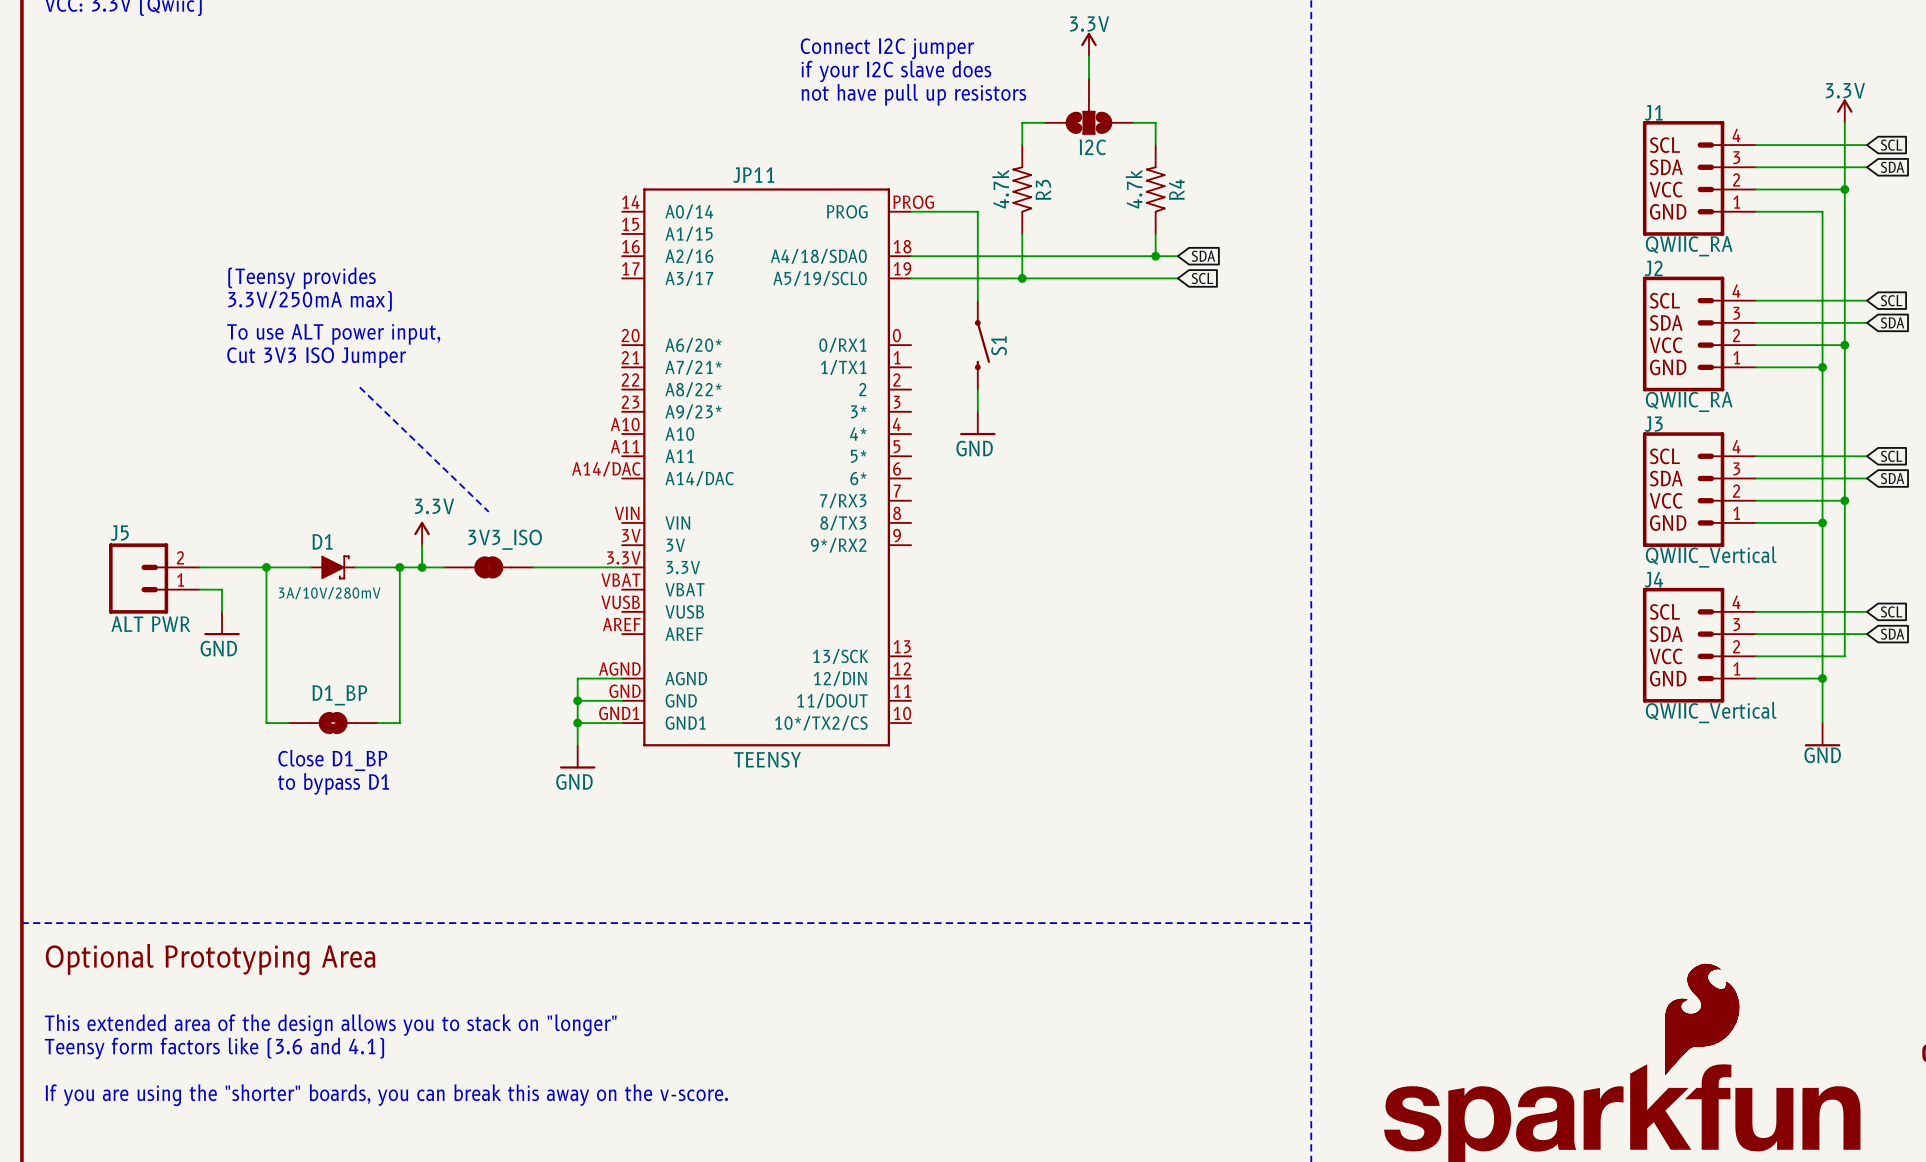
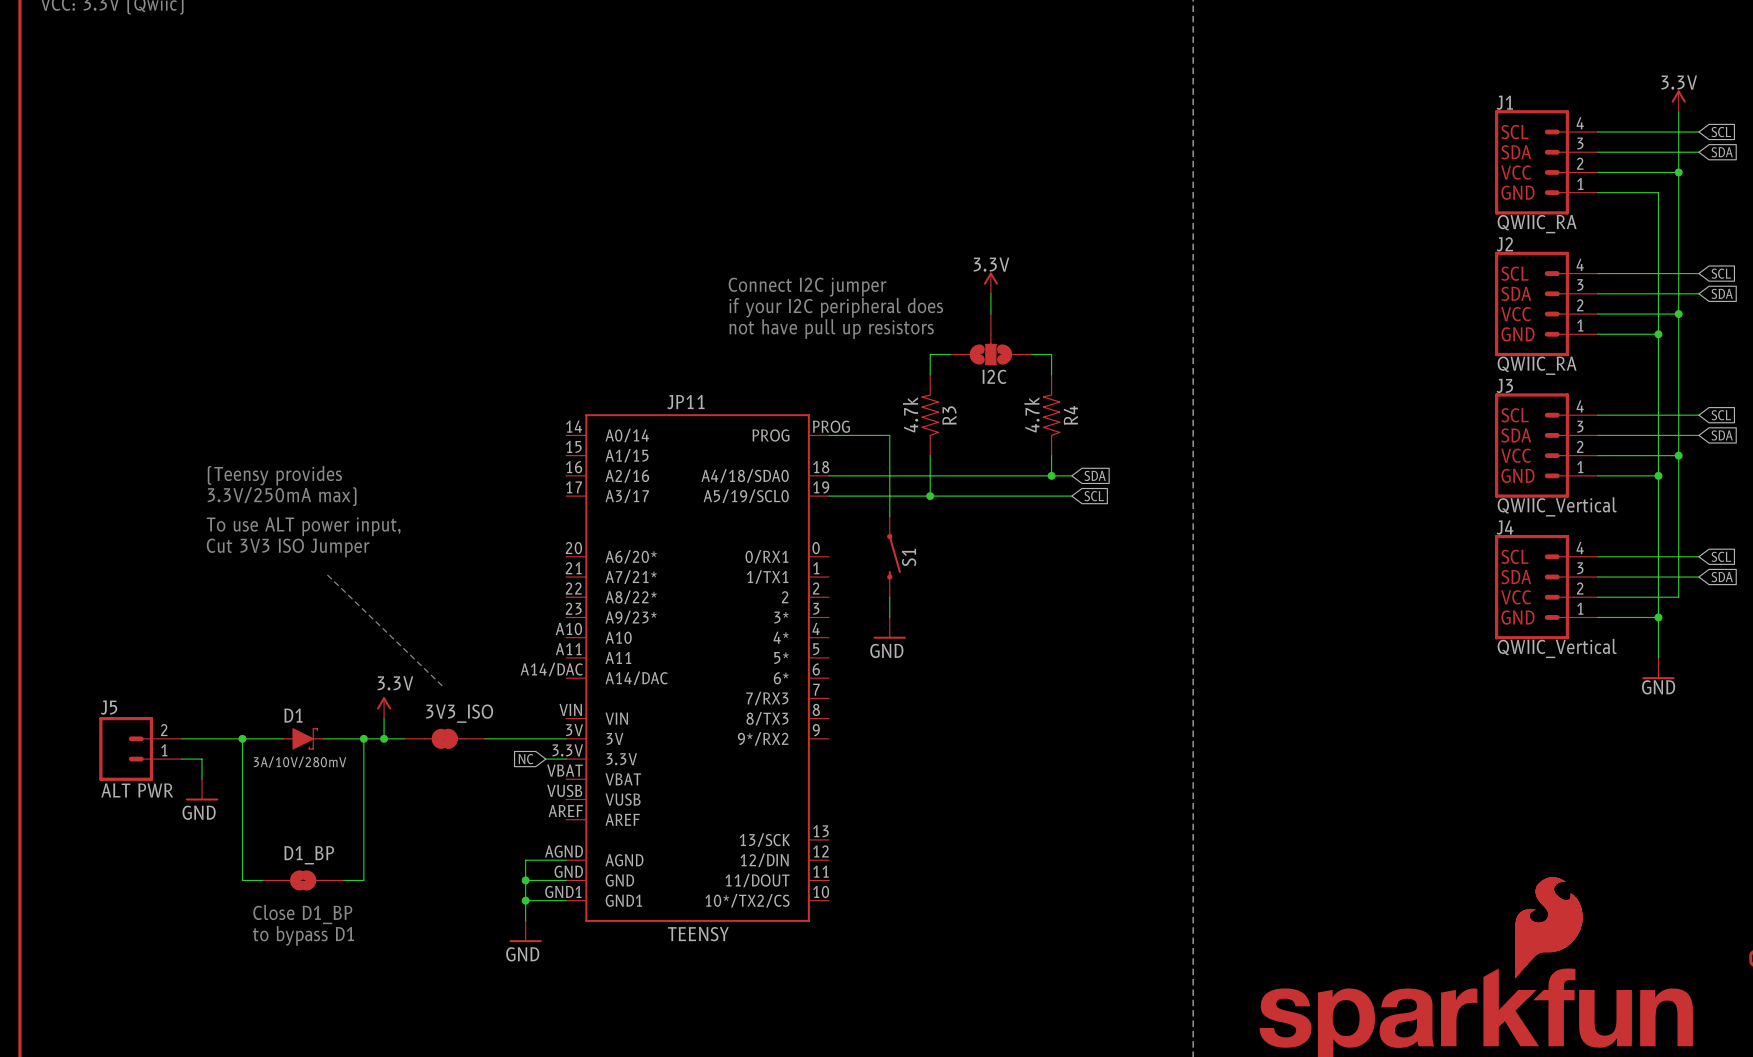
power symbol: 3.3V (1088, 44) -> none
text: Connect I2C jumper (887, 48) -> none
wire: (1088, 56) (1088, 78) -> none
text: if your I2C slave does (896, 71) -> none
text: not have pull up resistors (914, 94) -> none
I2C position: (1088, 106) -> (990, 339)
wire: (1044, 122) (1022, 122) (1022, 145) -> none
wire: (1133, 122) (1155, 122) (1155, 145) -> none
R3 position: (1022, 189) -> (930, 415)
R4 position: (1155, 189) -> (1051, 415)
wire: (911, 211) (977, 211) (977, 300) -> none
wire: (1022, 233) (1022, 278) -> none
wire: (1155, 233) (1155, 256) -> (990, 293) (990, 314)
wire: (911, 256) (1177, 256) -> none
junction: (1155, 256) -> none
global label: SDA (1203, 256) -> none
text: (Teensy provides (302, 278) -> none
wire: (911, 278) (1177, 278) -> none
junction: (1022, 278) -> none
global label: SCL (1202, 278) -> none
text: 3.3V/250mA max) (310, 301) -> none
power symbol: none -> 3.3V (990, 283)
text: none -> Connect I2C jumper (807, 287)
text: To use ALT power input, (333, 334) -> none
text: none -> if your I2C peripheral does (836, 307)
S1 position: (982, 345) -> (894, 556)
text: Cut 3V3 ISO Jumper (316, 357) -> none
text: none -> not have pull up resistors (831, 329)
line: (359, 387) (488, 511) -> none
wire: (977, 389) (977, 411) -> (1051, 455) (1051, 475)
wire: none -> (950, 354) (930, 354) (930, 374)
wire: none -> (1031, 354) (1051, 354) (1051, 374)
power symbol: GND (977, 423) -> none
JP11 position: (766, 467) -> (697, 668)
wire: none -> (829, 435) (889, 435) (889, 516)
wire: none -> (930, 455) (930, 496)
text: none -> (Teensy provides (274, 475)
wire: none -> (829, 475) (1071, 475)
junction: none -> (1051, 475)
global label: none -> SDA (1095, 475)
power symbol: 3.3V (422, 533) -> none
text: none -> 3.3V/250mA max) (282, 496)
wire: (422, 545) (422, 567) -> none
wire: none -> (829, 496) (1071, 496)
junction: none -> (930, 496)
global label: none -> SCL (1094, 496)
wire: (199, 567) (310, 567) -> none
wire: (266, 567) (266, 723) (288, 723) -> none
junction: (266, 567) -> none
D1 position: (333, 567) -> (303, 738)
wire: (355, 567) (444, 567) -> none
wire: (399, 567) (399, 723) (377, 723) -> none
junction: (399, 567) -> none
junction: (422, 567) -> none
3V3_ISO position: (488, 567) -> (444, 738)
wire: (533, 567) (622, 567) -> none
J5 position: (154, 578) -> (140, 748)
text: none -> To use ALT power input, (303, 526)
wire: (199, 589) (221, 589) (221, 611) -> none
text: none -> Cut 3V3 ISO Jumper (288, 547)
power symbol: GND (221, 623) -> none
line: none -> (327, 574) (444, 688)
wire: none -> (889, 597) (889, 617)
wire: (622, 678) (577, 678) (577, 745) -> none
power symbol: none -> GND (889, 628)
wire: (577, 700) (622, 700) -> none
junction: (577, 700) -> none
D1_BP position: (333, 723) -> (303, 880)
wire: (577, 723) (622, 723) -> none
junction: (577, 723) -> none
power symbol: GND (577, 756) -> none
text: Close D1_BP (332, 760) -> none
power symbol: none -> 3.3V (384, 707)
text: to bypass D1 (333, 783) -> none
wire: none -> (384, 718) (384, 738)
wire: none -> (181, 738) (282, 738)
wire: none -> (242, 738) (242, 880) (262, 880)
junction: none -> (242, 738)
wire: none -> (323, 738) (404, 738)
wire: none -> (363, 738) (363, 880) (343, 880)
junction: none -> (363, 738)
junction: none -> (384, 738)
wire: none -> (485, 738) (566, 738)
wire: none -> (181, 759) (202, 759) (202, 779)
global label: none -> NC (525, 759)
wire: none -> (545, 759) (566, 759)
power symbol: none -> GND (202, 789)
line: (21, 923) (1311, 923) -> none
wire: none -> (566, 860) (525, 860) (525, 920)
text: Optional Prototyping Area (210, 959) -> none
wire: none -> (525, 880) (566, 880)
junction: none -> (525, 880)
wire: none -> (525, 900) (566, 900)
junction: none -> (525, 900)
text: none -> Close D1_BP (302, 914)
power symbol: none -> GND (525, 931)
text: This extended area of the design allows you to stack on "longer" (330, 1025) -> none
text: none -> to bypass D1 (303, 935)
text: Teensy form factors like (3.6 and 4.1) (214, 1048) -> none
text: If you are using the "shorter" boards, you can break this away on the v-score. (386, 1095) -> none

